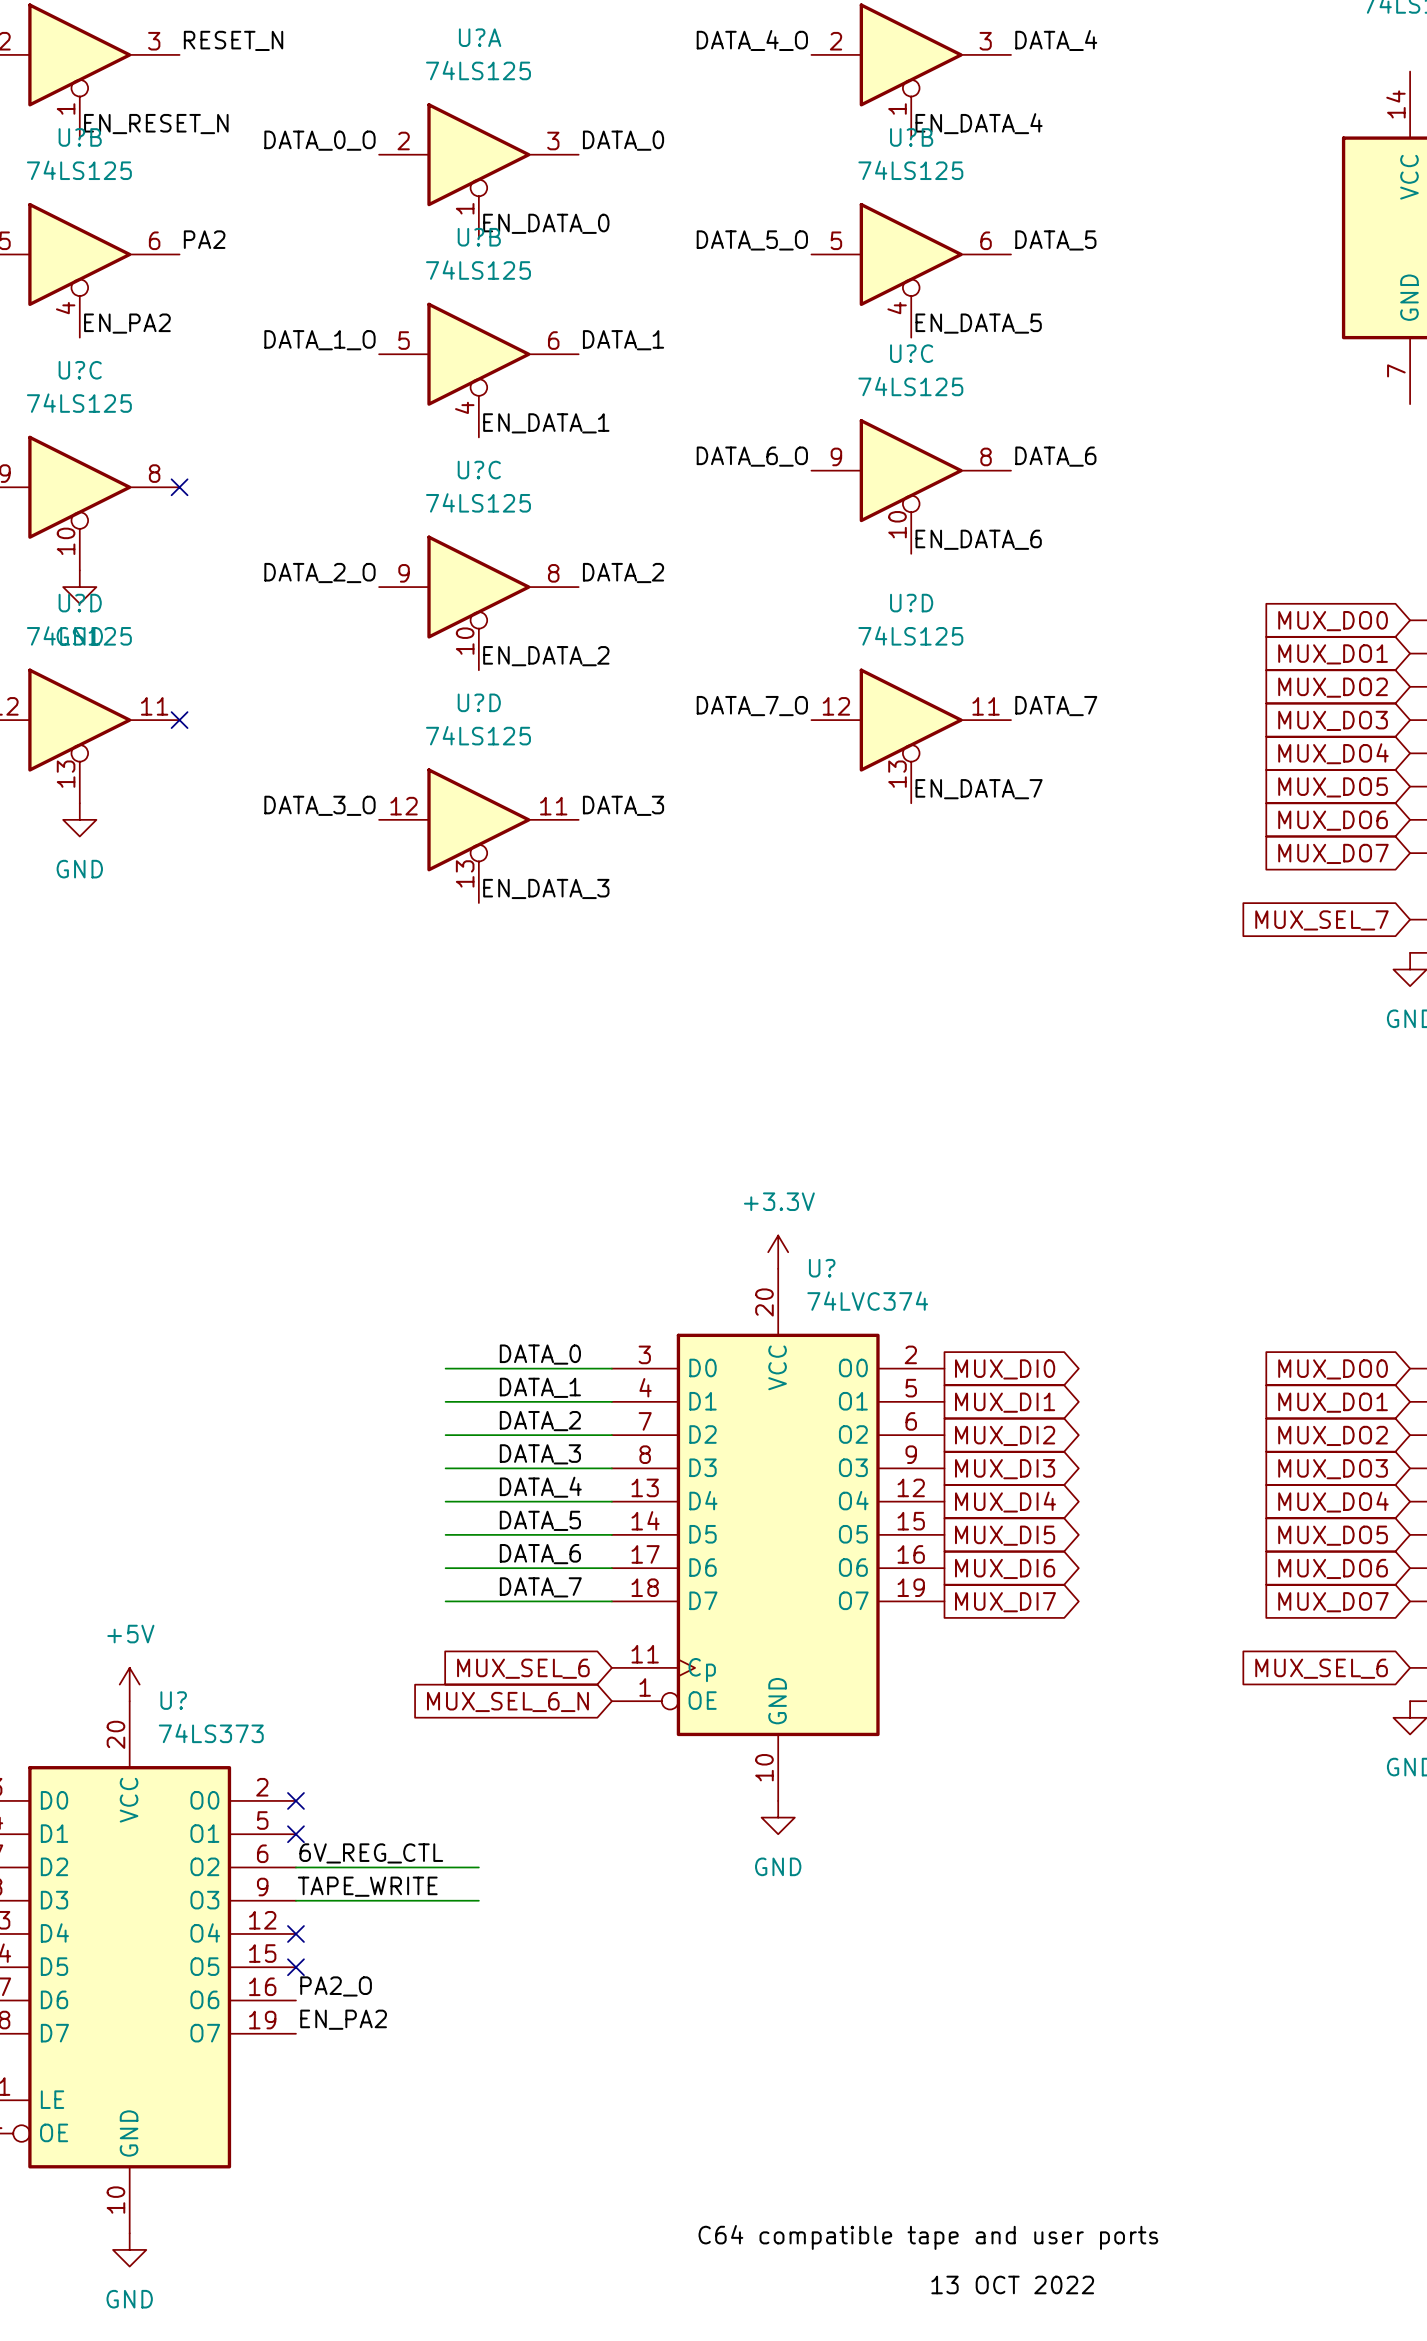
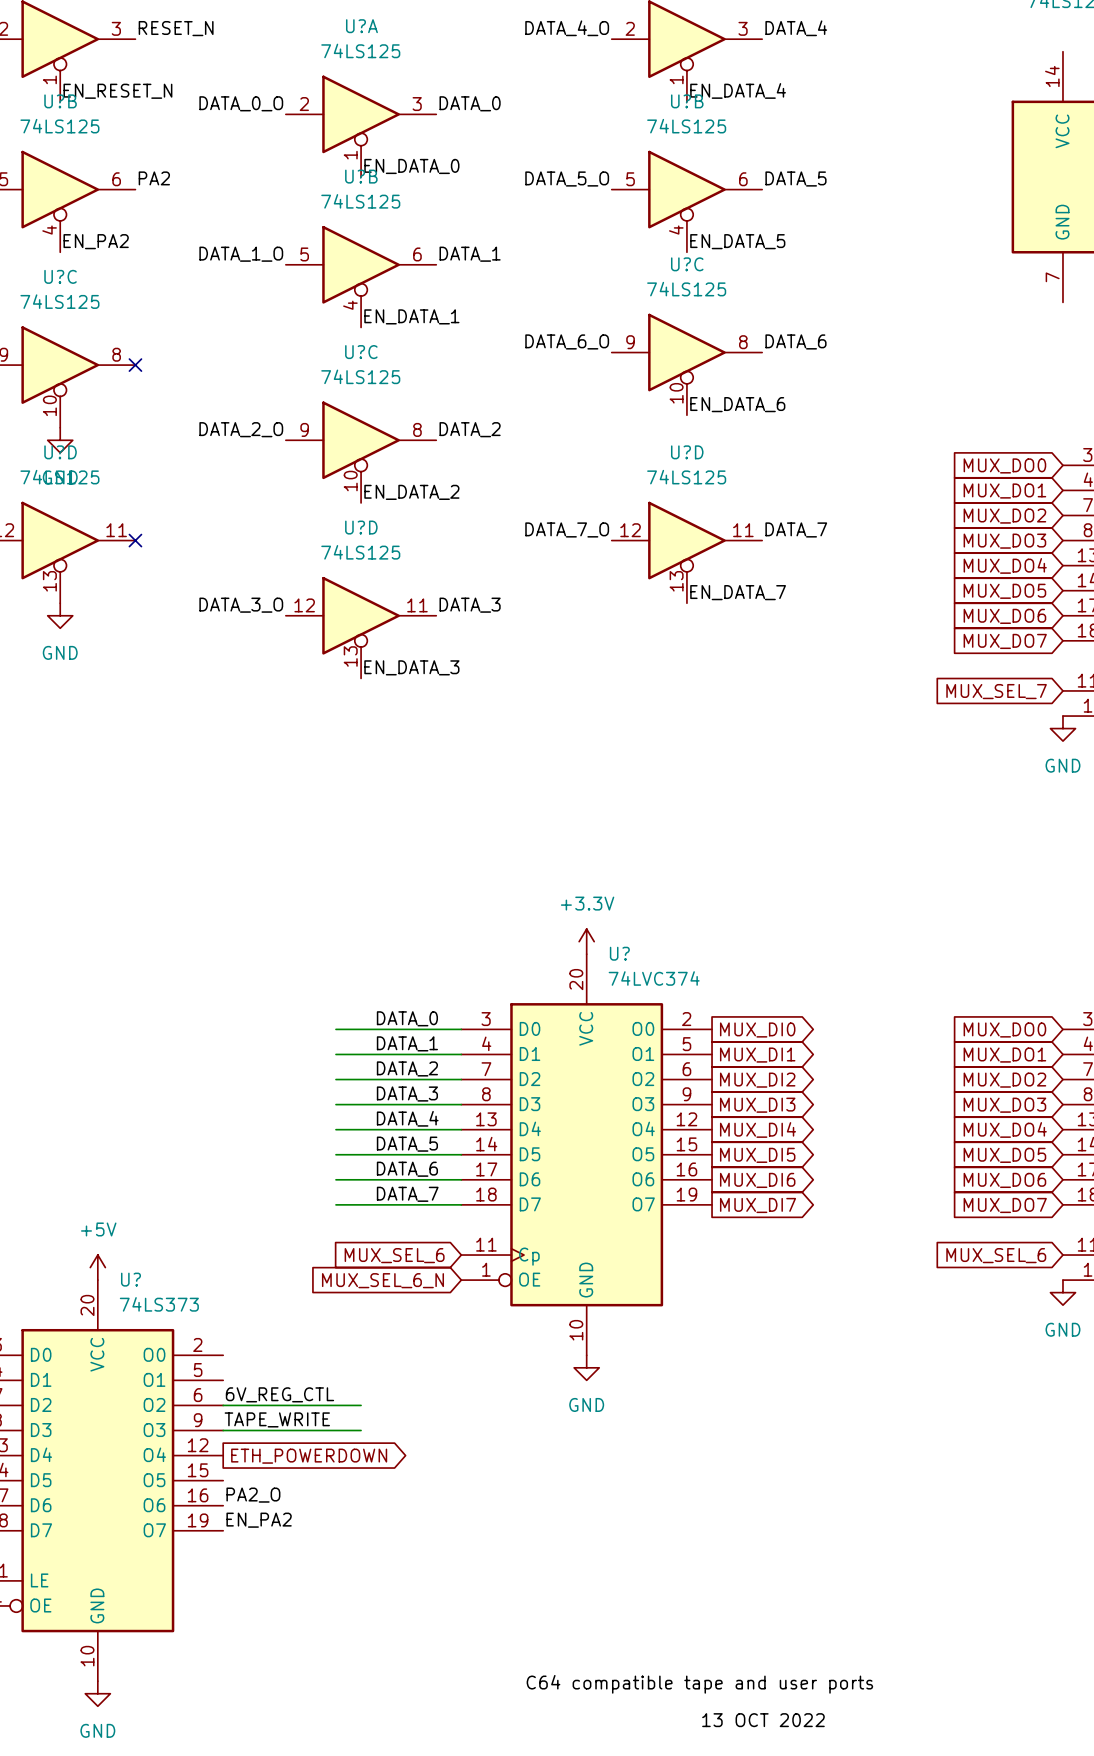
no-connect mark: (295, 1800) -> none
no-connect mark: (295, 1834) -> none
no-connect mark: (295, 1933) -> none
global label: none -> ETH_POWERDOWN (309, 1456)
no-connect mark: (295, 1967) -> none

